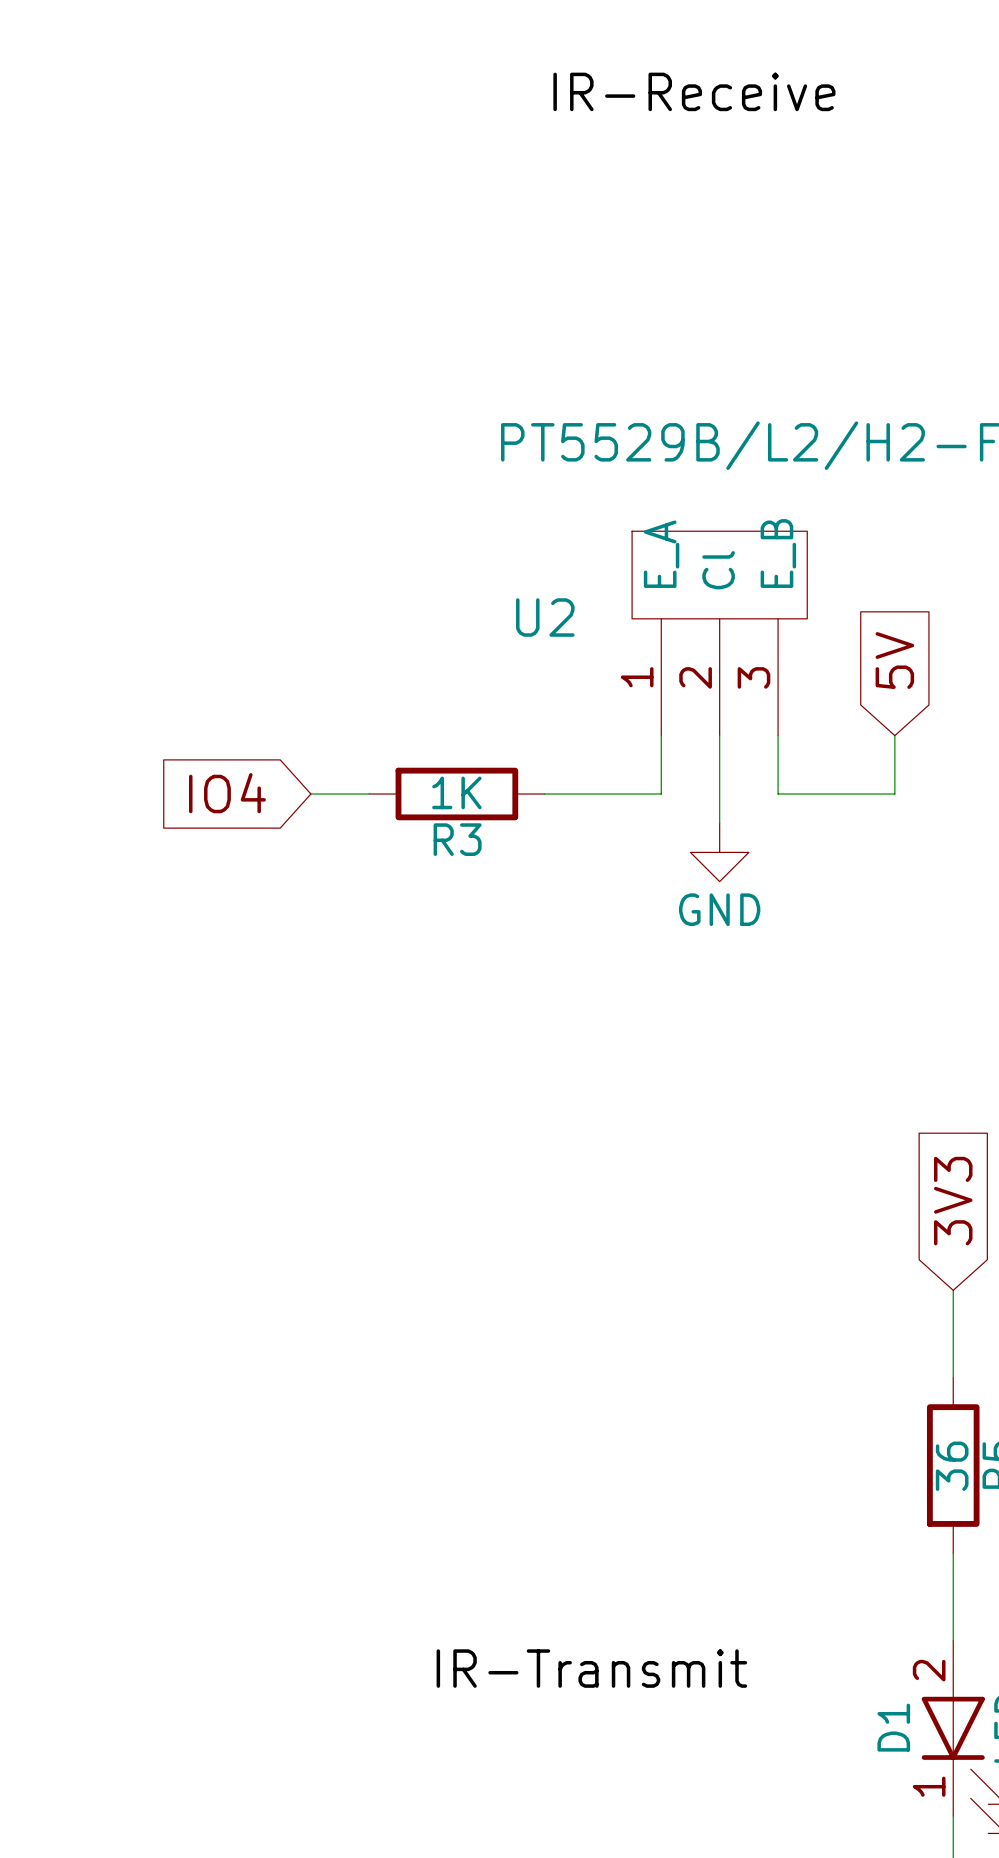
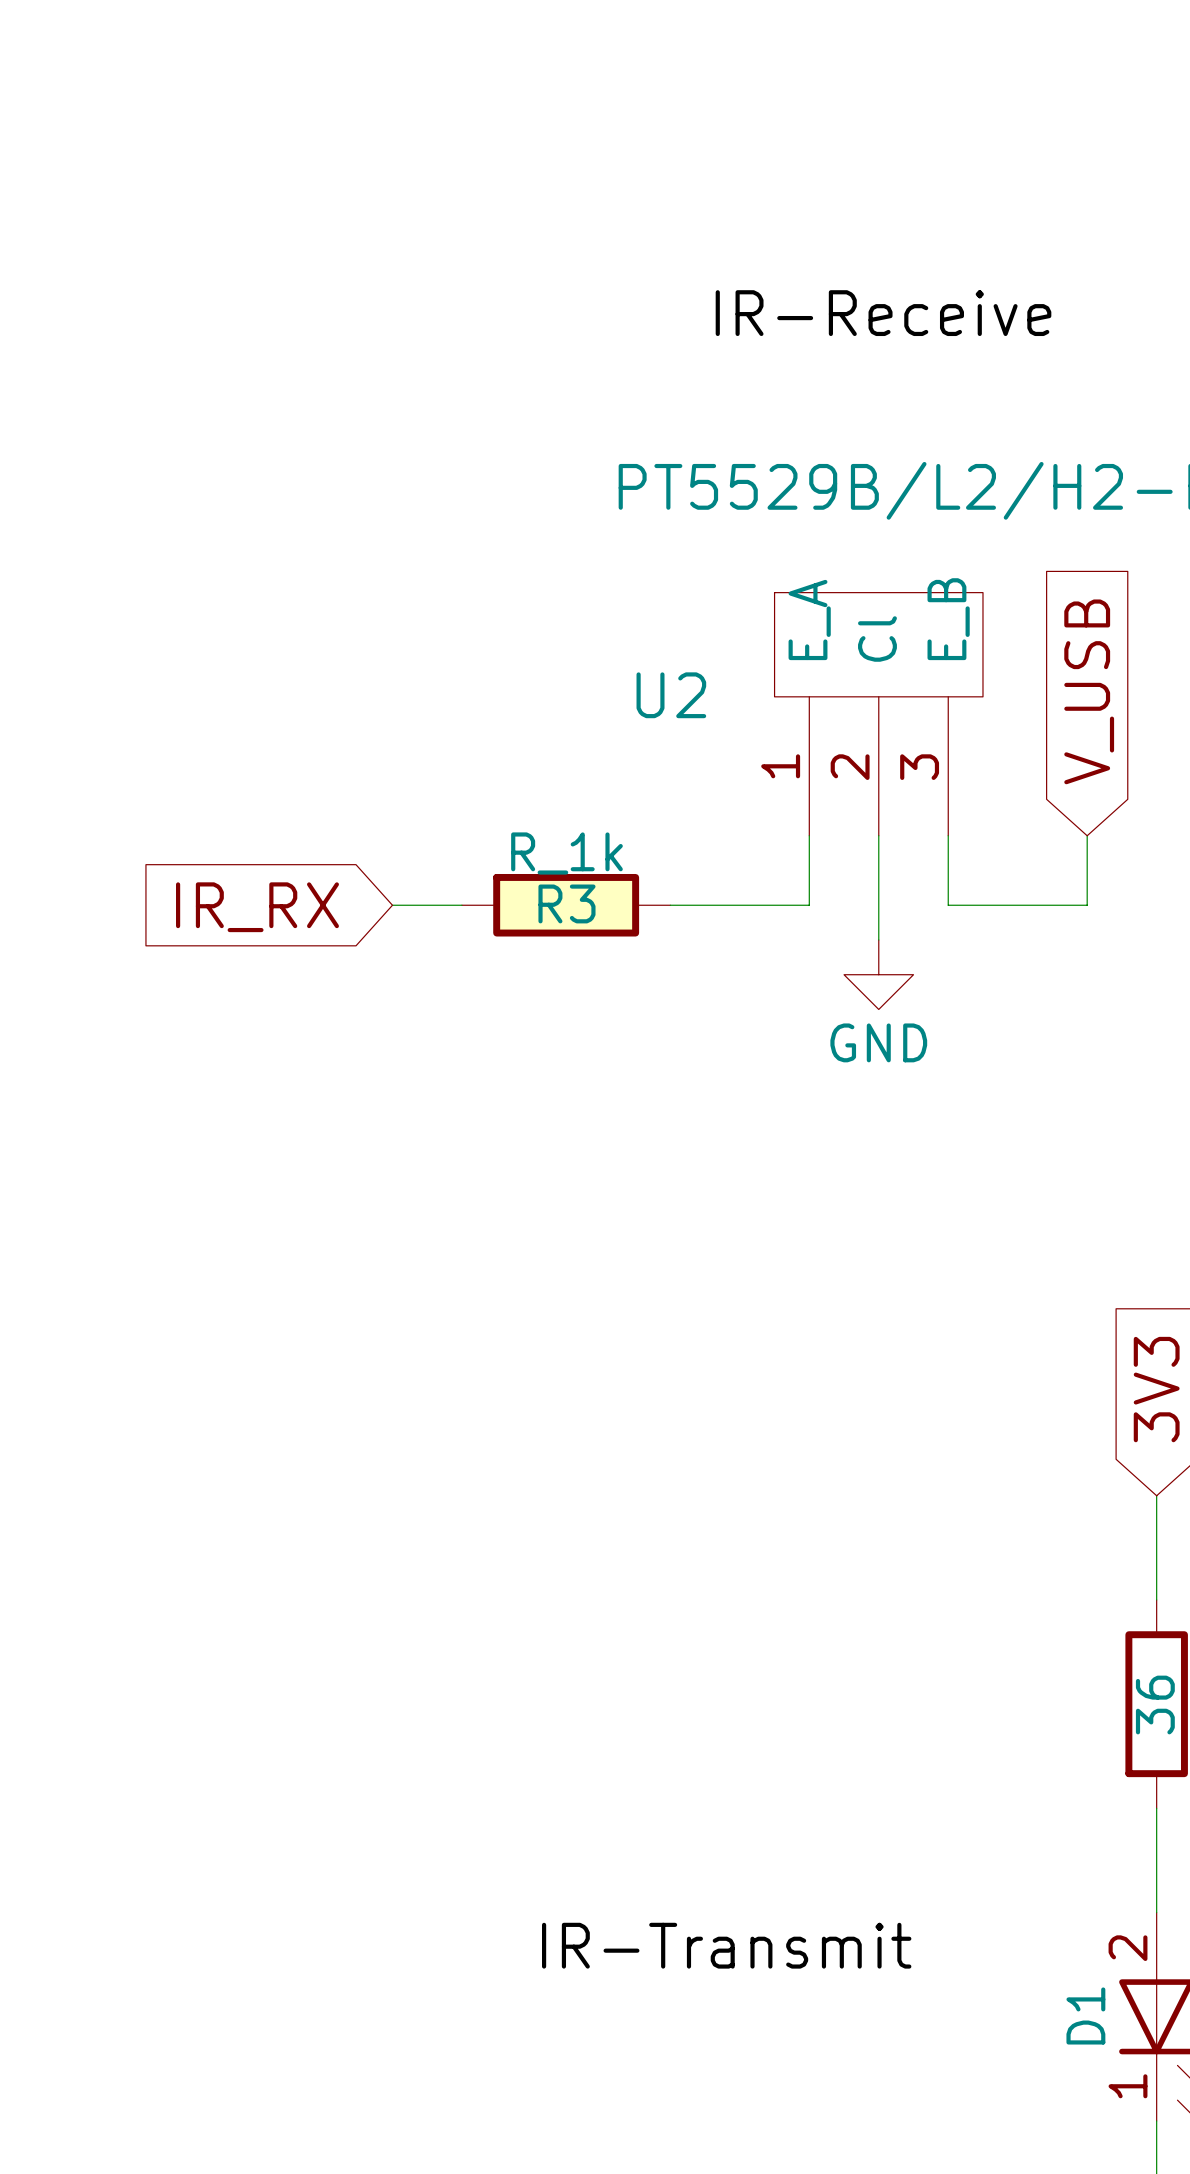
label position: IR-Receive (694, 91) -> IR-Receive (883, 313)
global label: 5V (894, 660) -> V_USB (1089, 691)
R3 symbol: [369, 767, 545, 821] -> [461, 873, 671, 937]
R3 value: 1K (456, 792) -> R_1k (566, 853)
global label: IO4 (227, 793) -> IR_RX (257, 907)
R3 name position: R3 (457, 839) -> R3 (566, 903)

